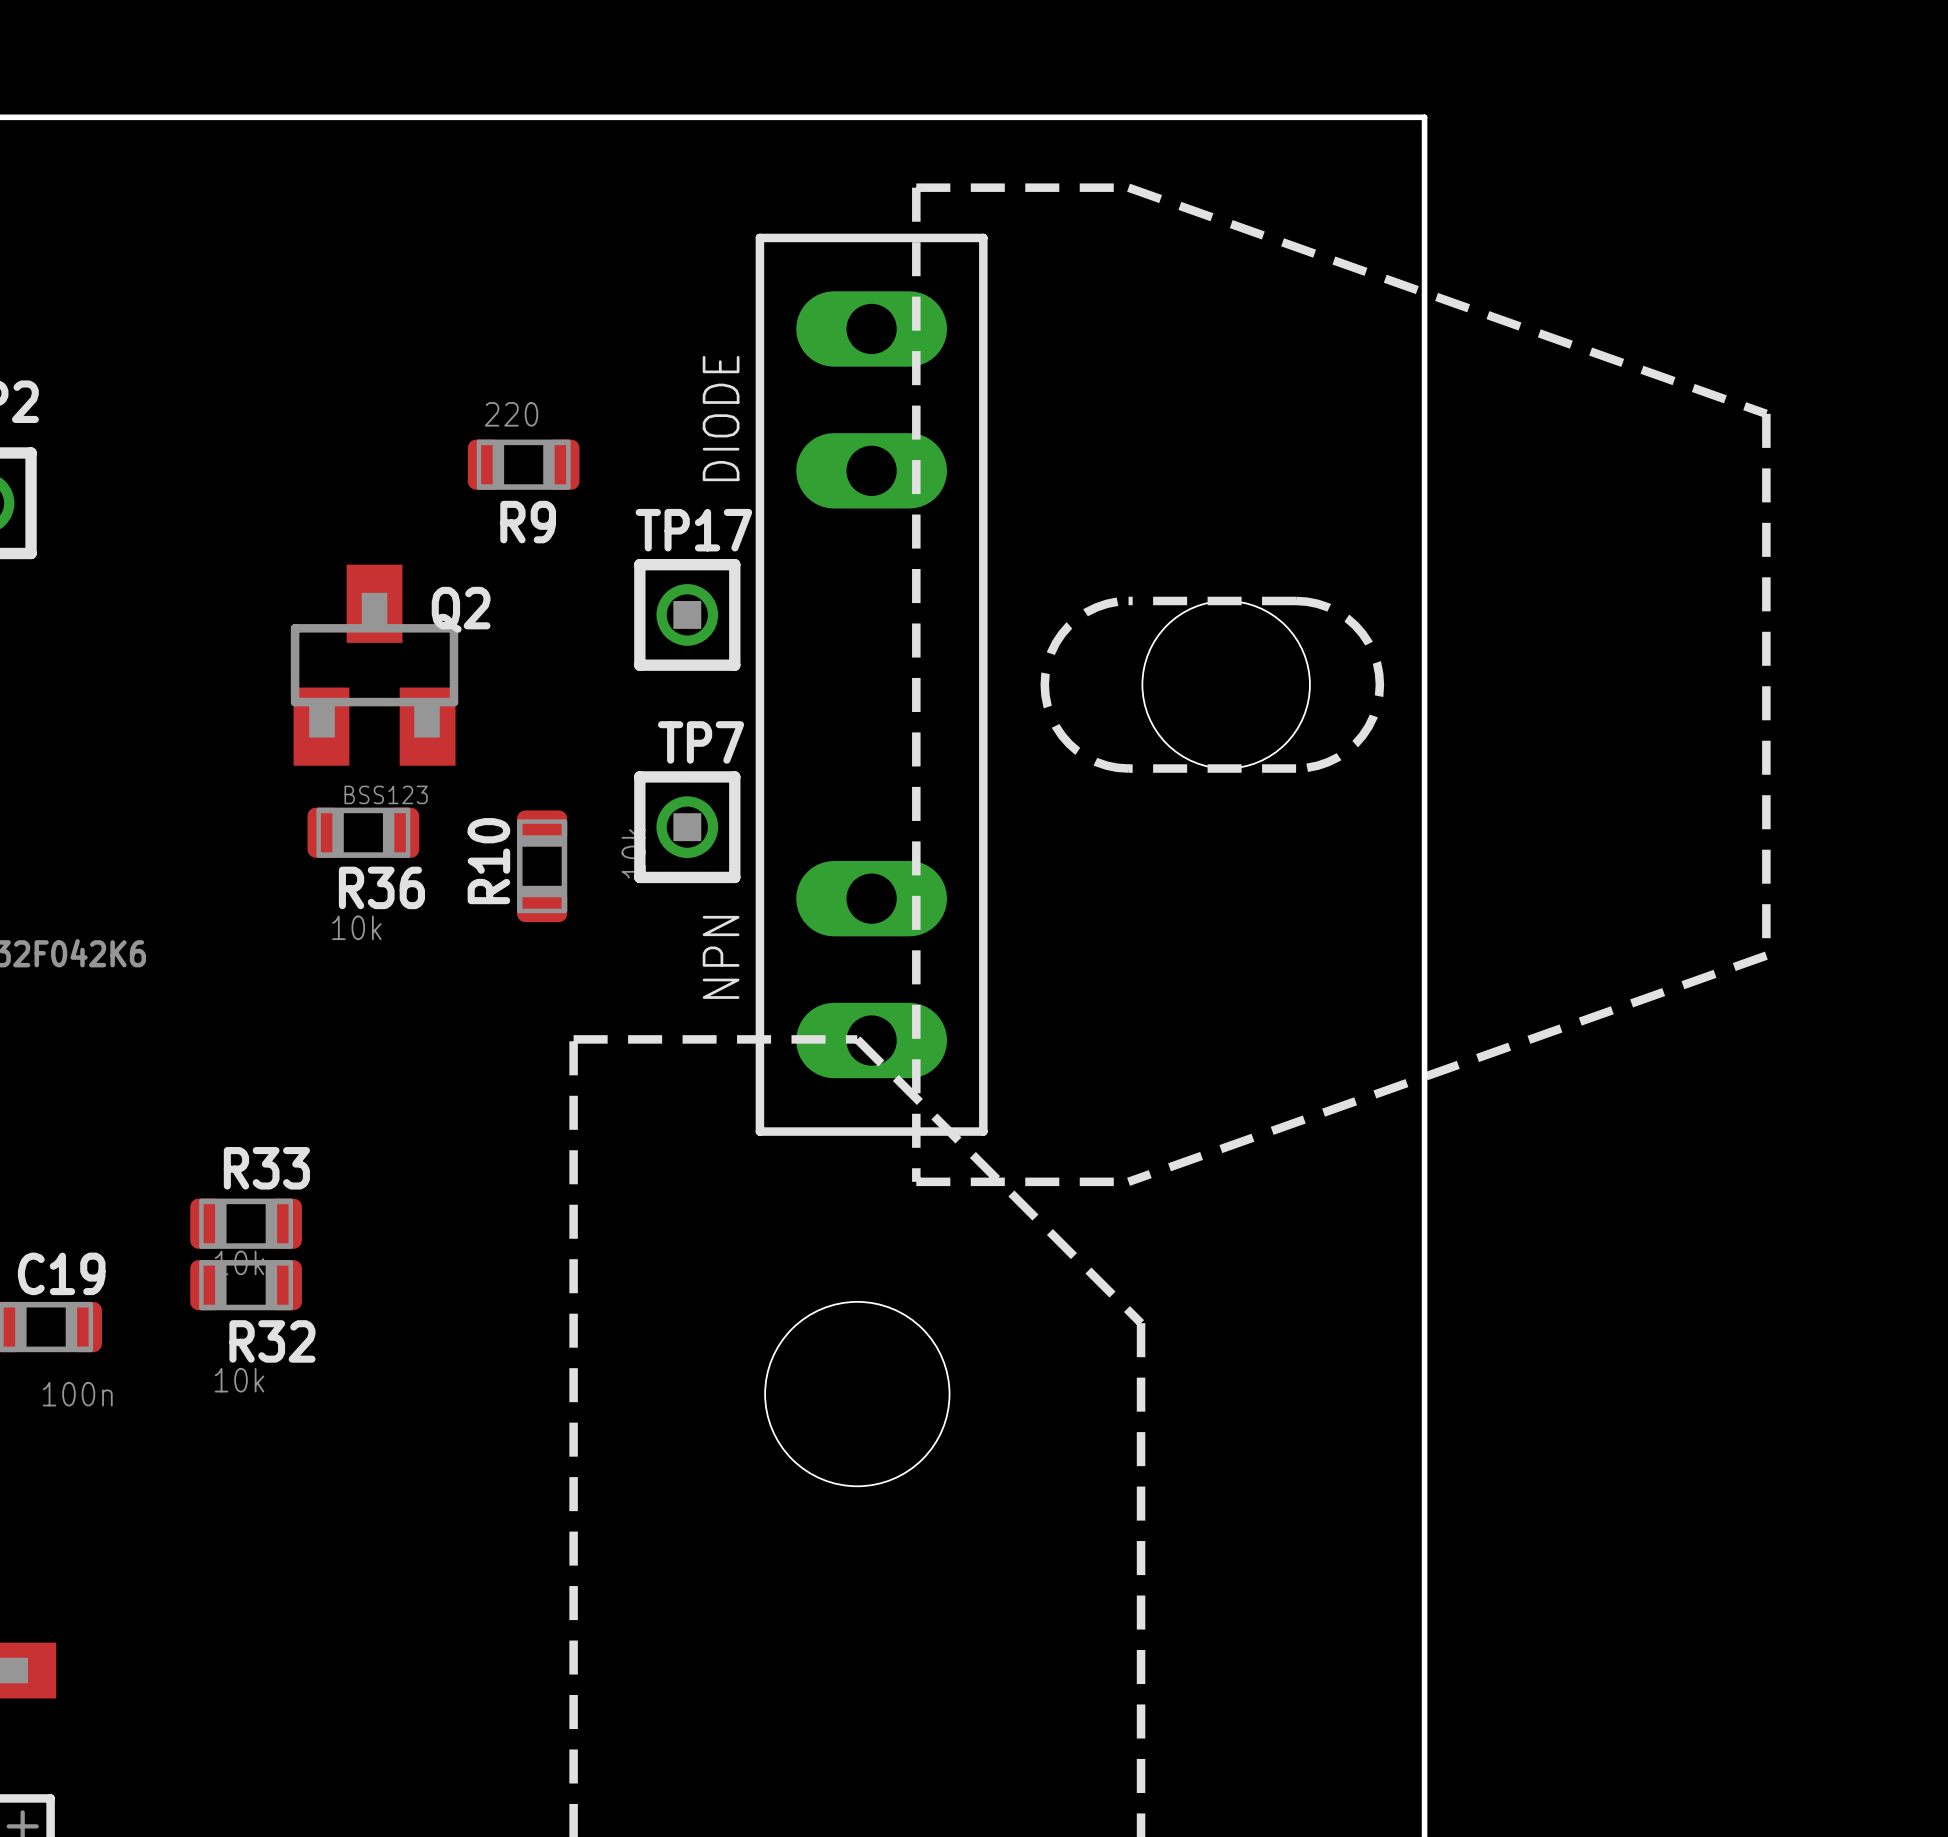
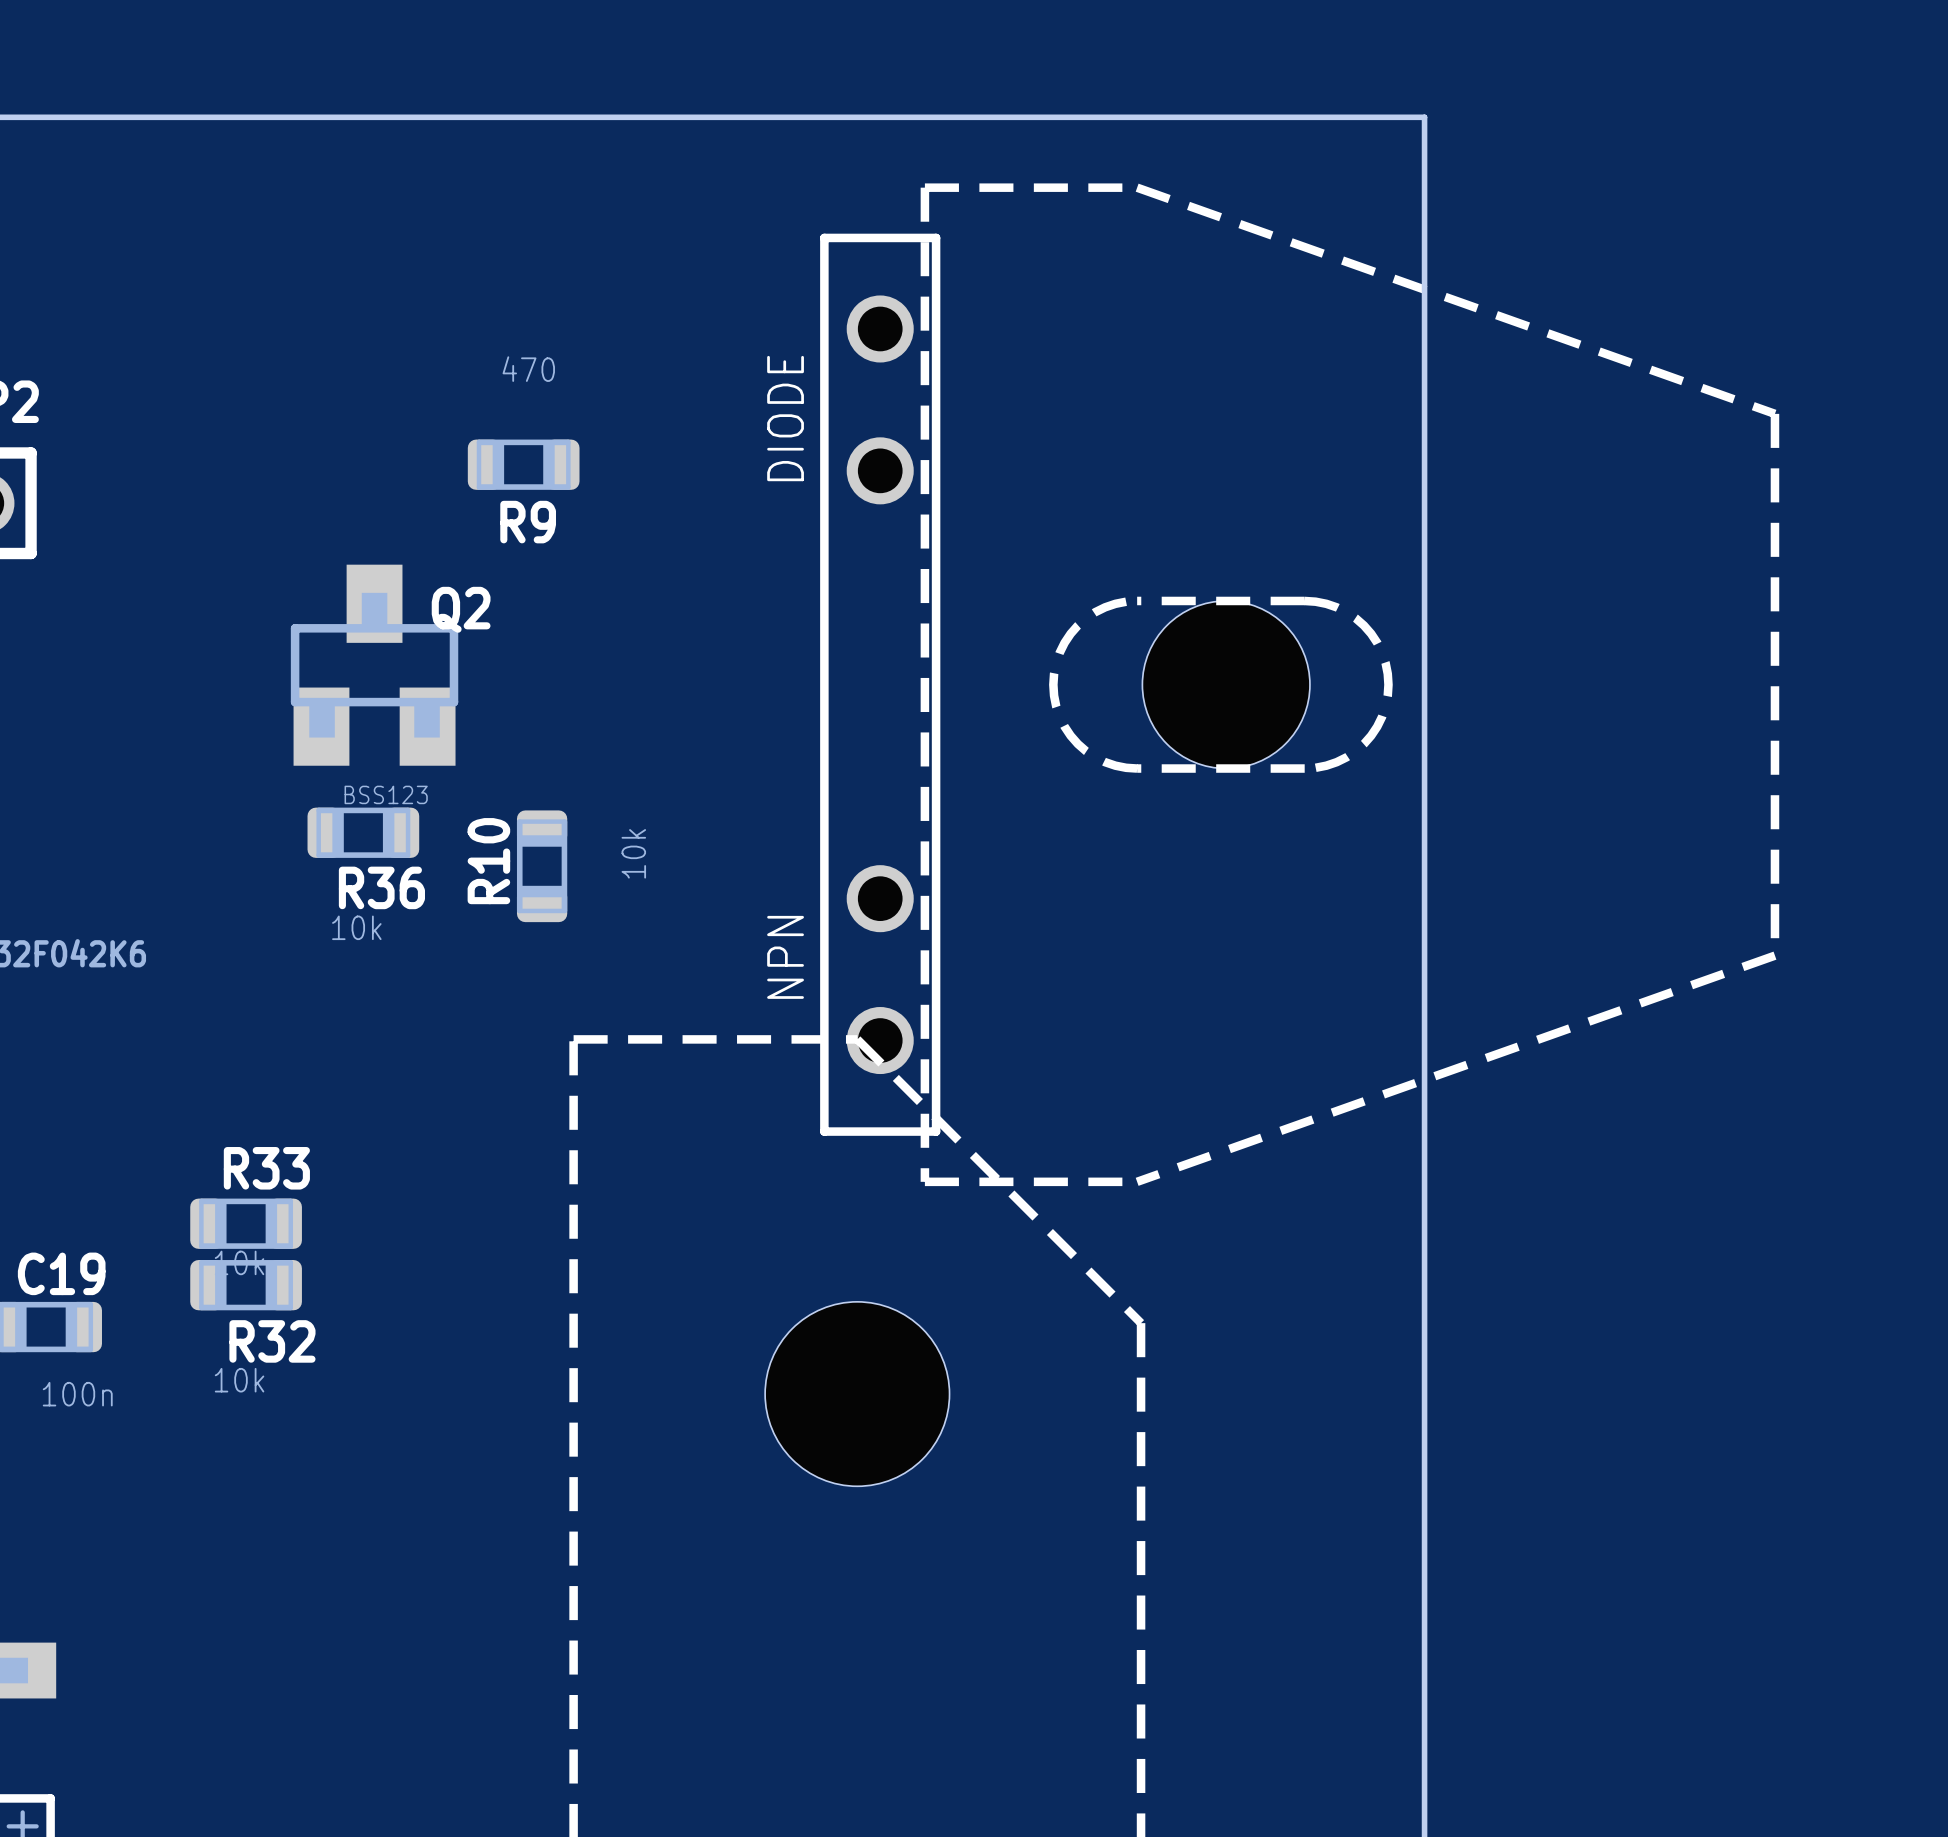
part footprint: [755, 183, 1771, 1187] -> [820, 183, 1780, 1187]
R9 value: 220 (511, 414) -> 470 (528, 369)
TP17: (687, 614) -> none
TP7: (687, 827) -> none

